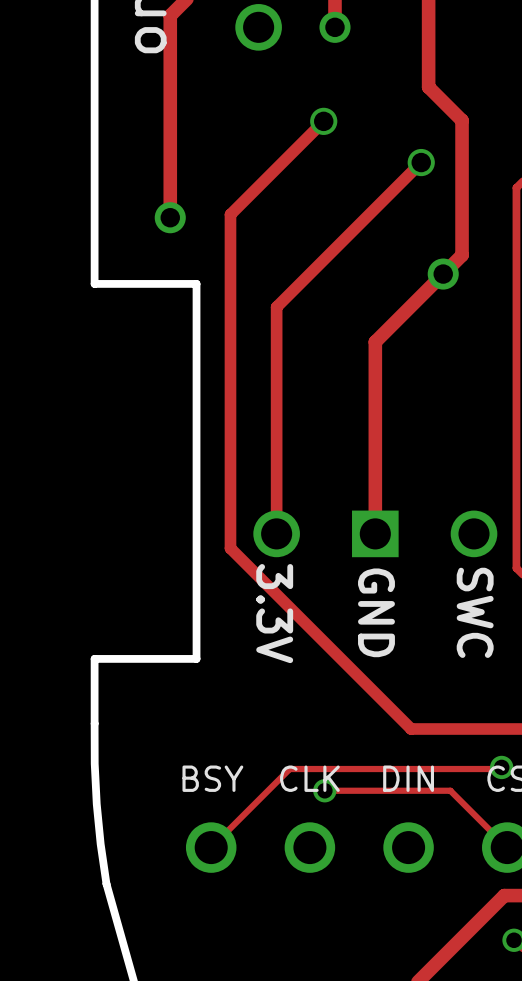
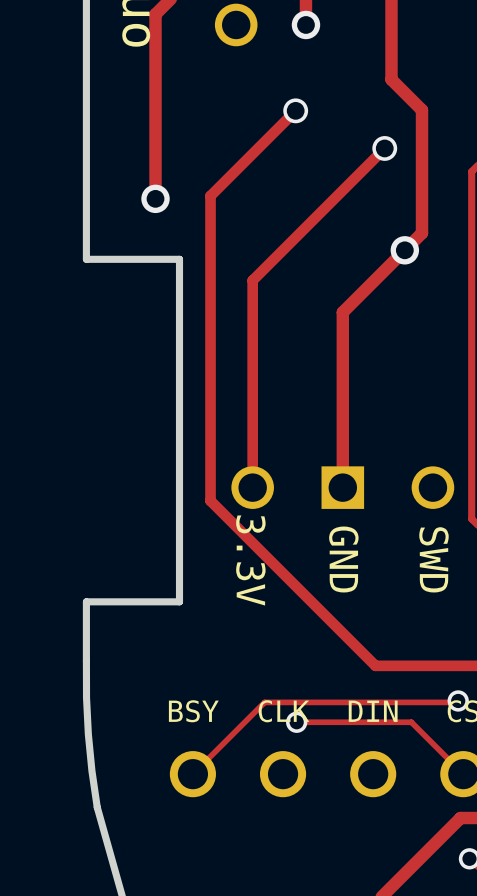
part text: SWC (475, 612) -> SWD (433, 559)

